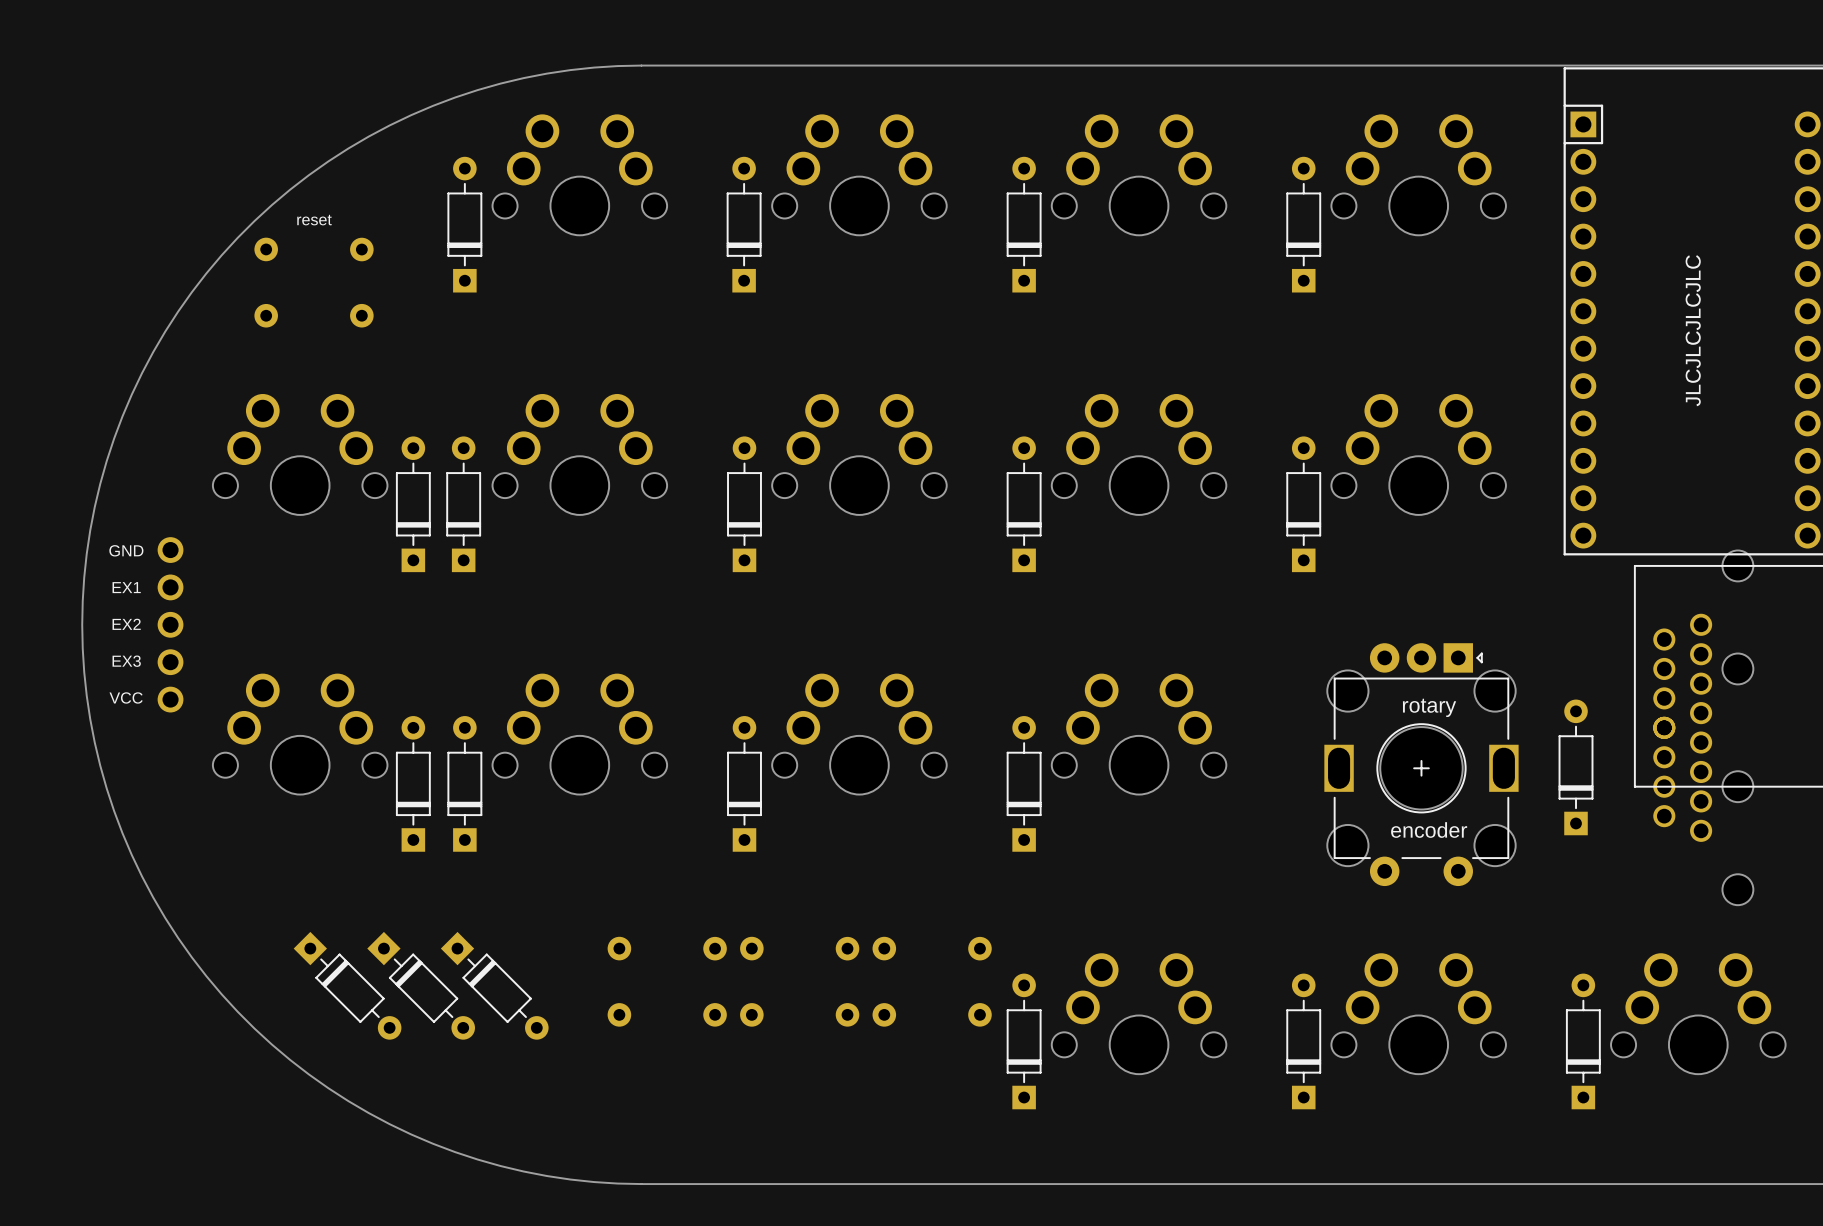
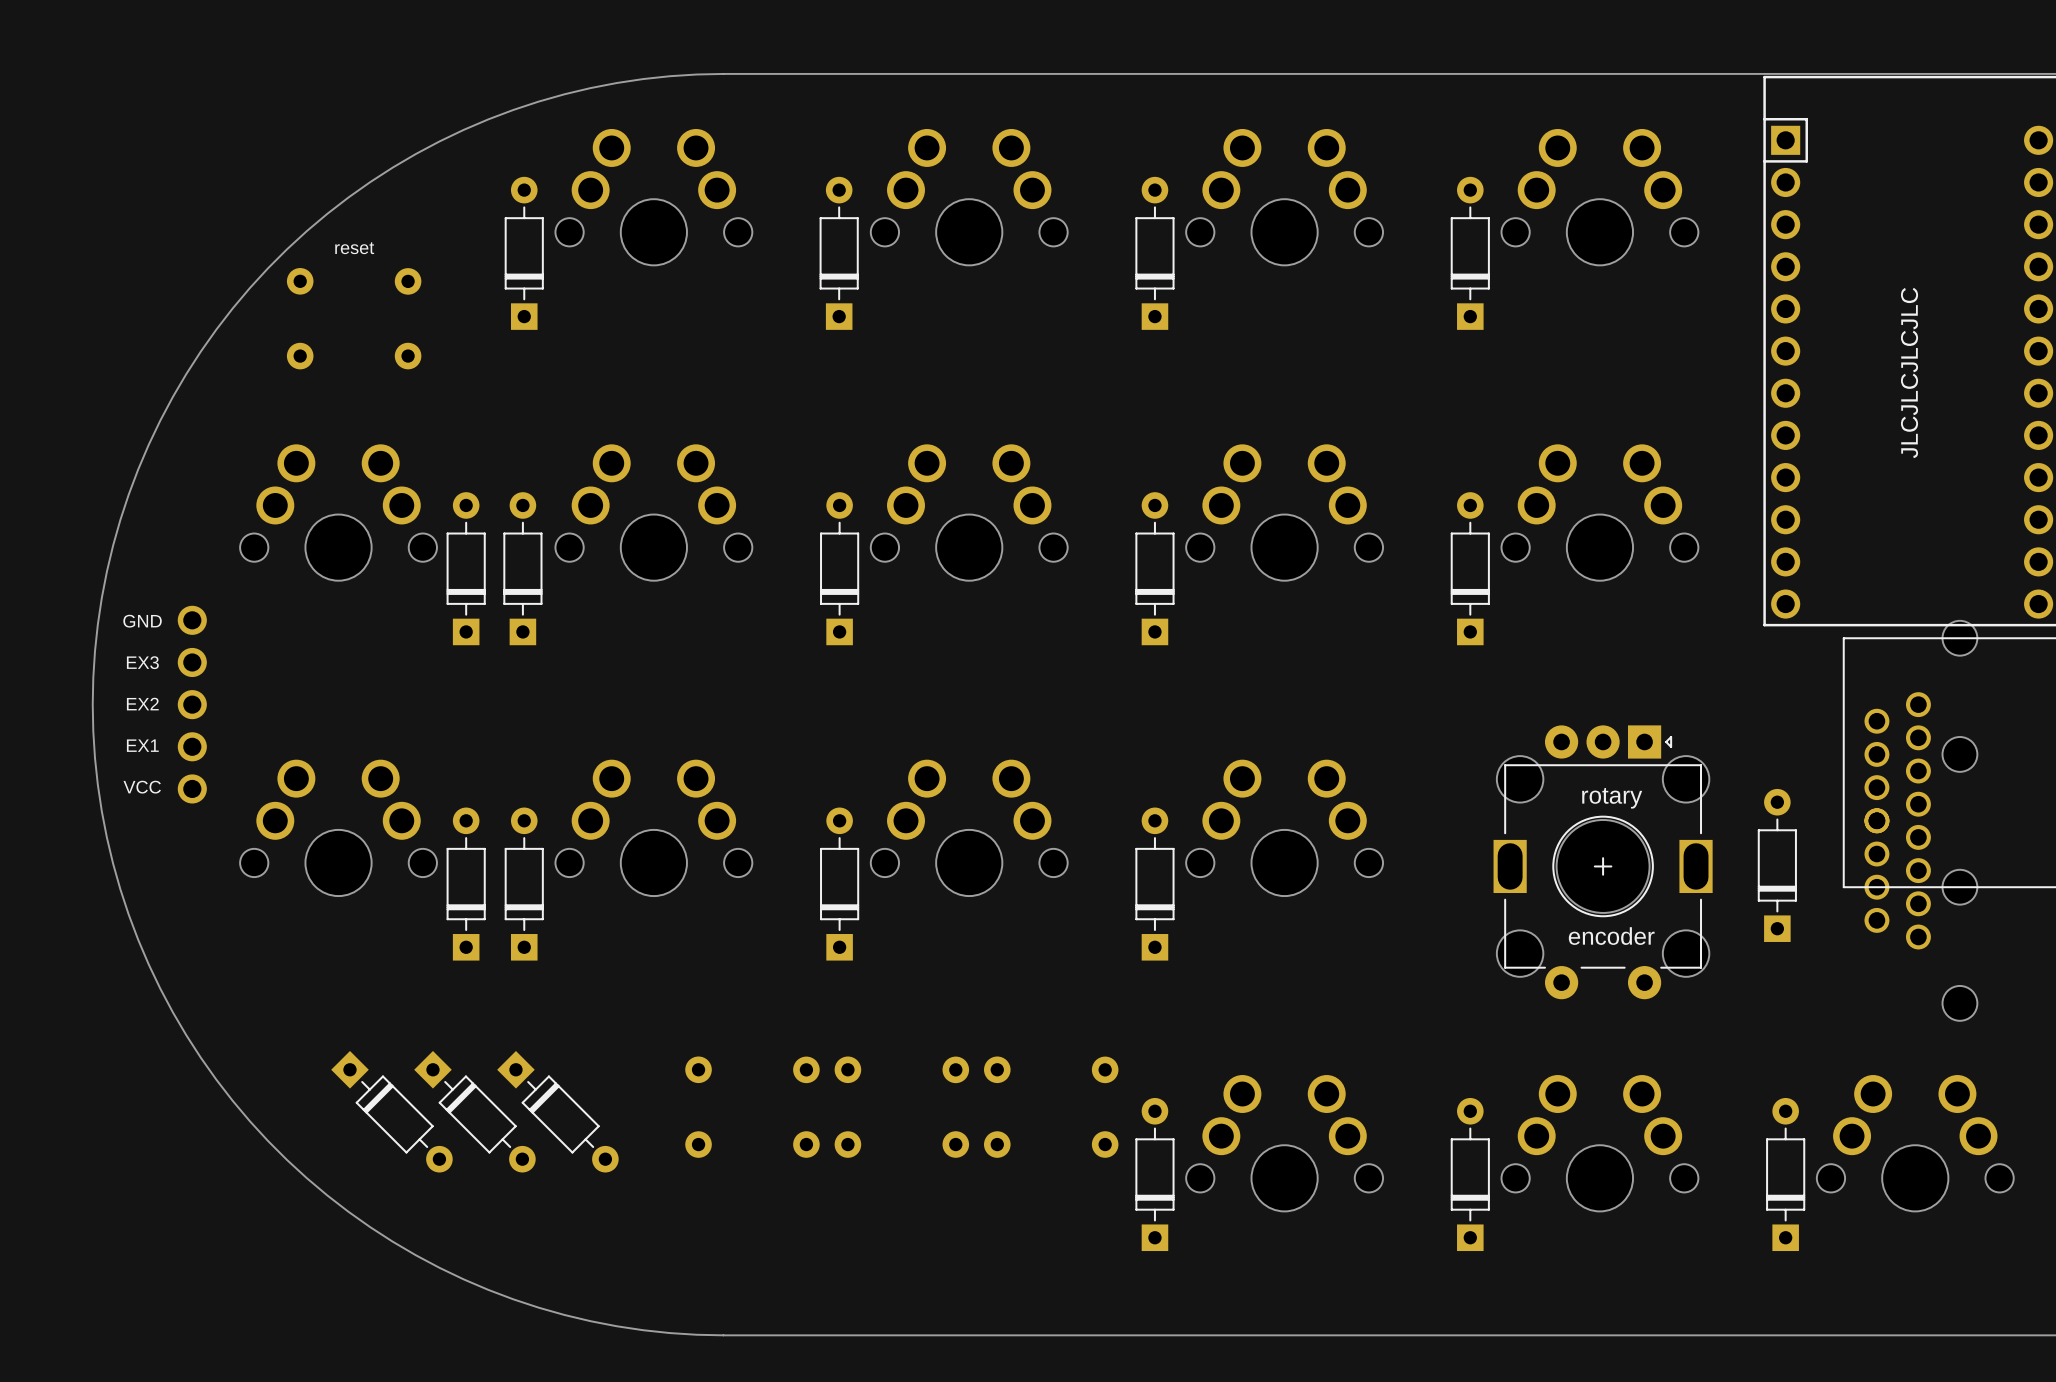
text: EX1 (126, 587) -> EX3 (142, 662)
text: EX3 (126, 661) -> EX1 (142, 745)

